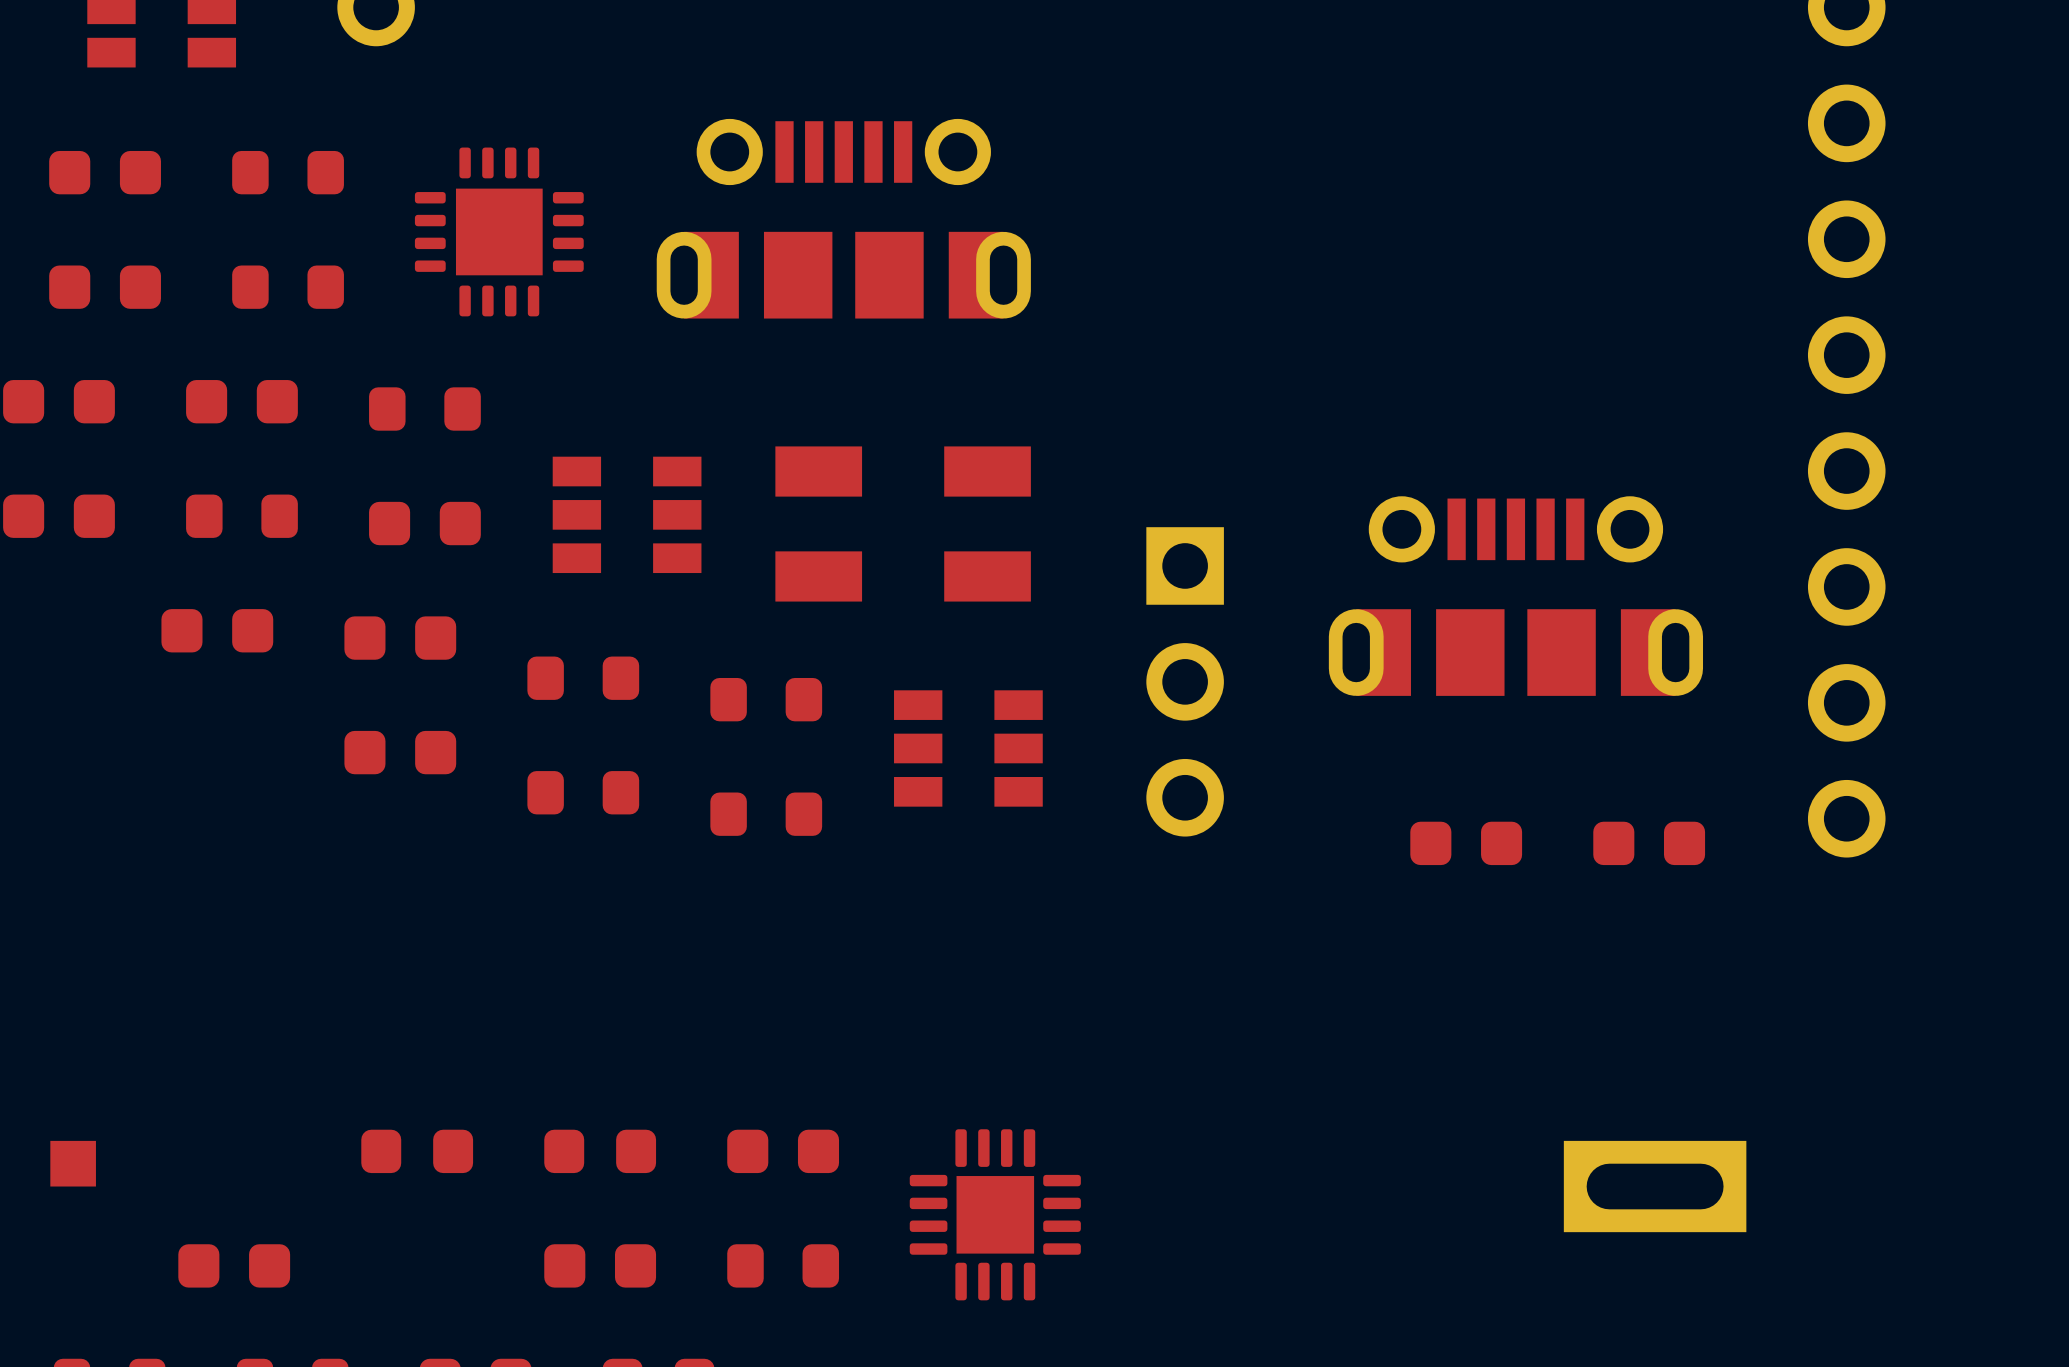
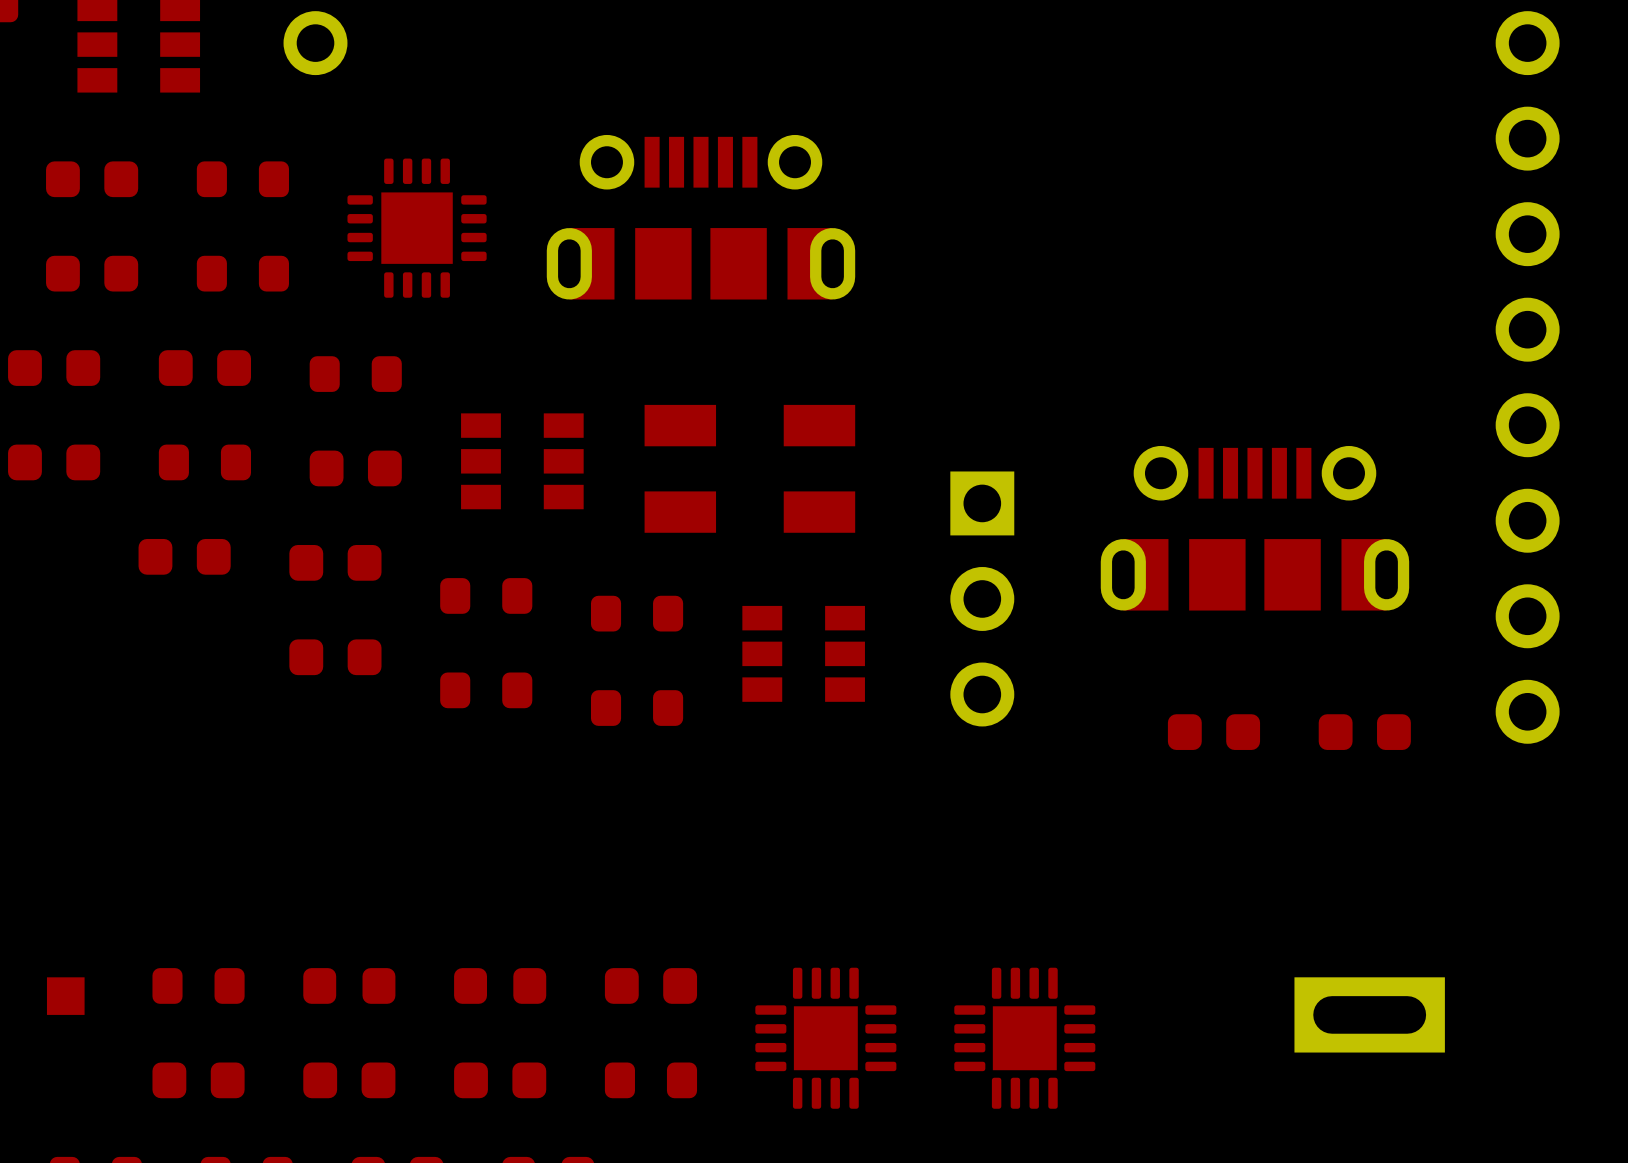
part: none -> (198, 985)
part: none -> (1024, 1038)
part: none -> (349, 1080)

